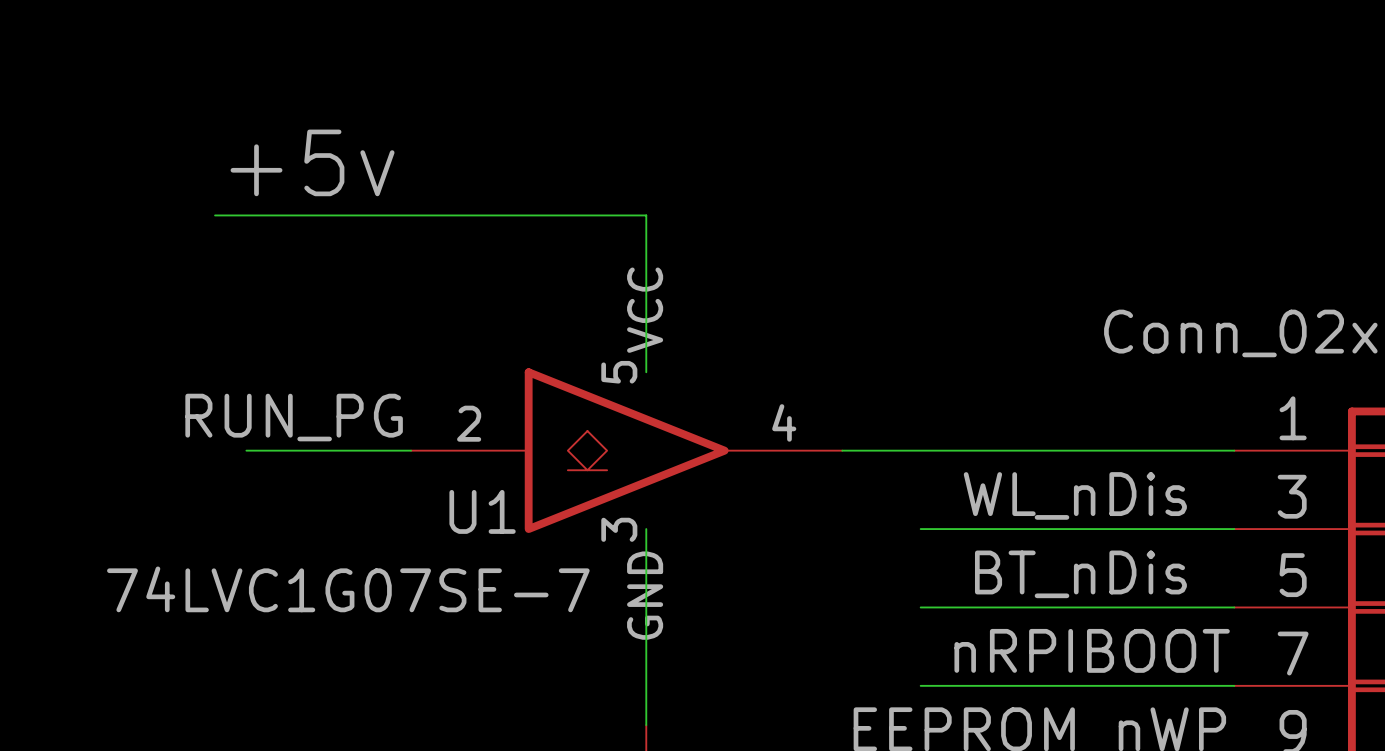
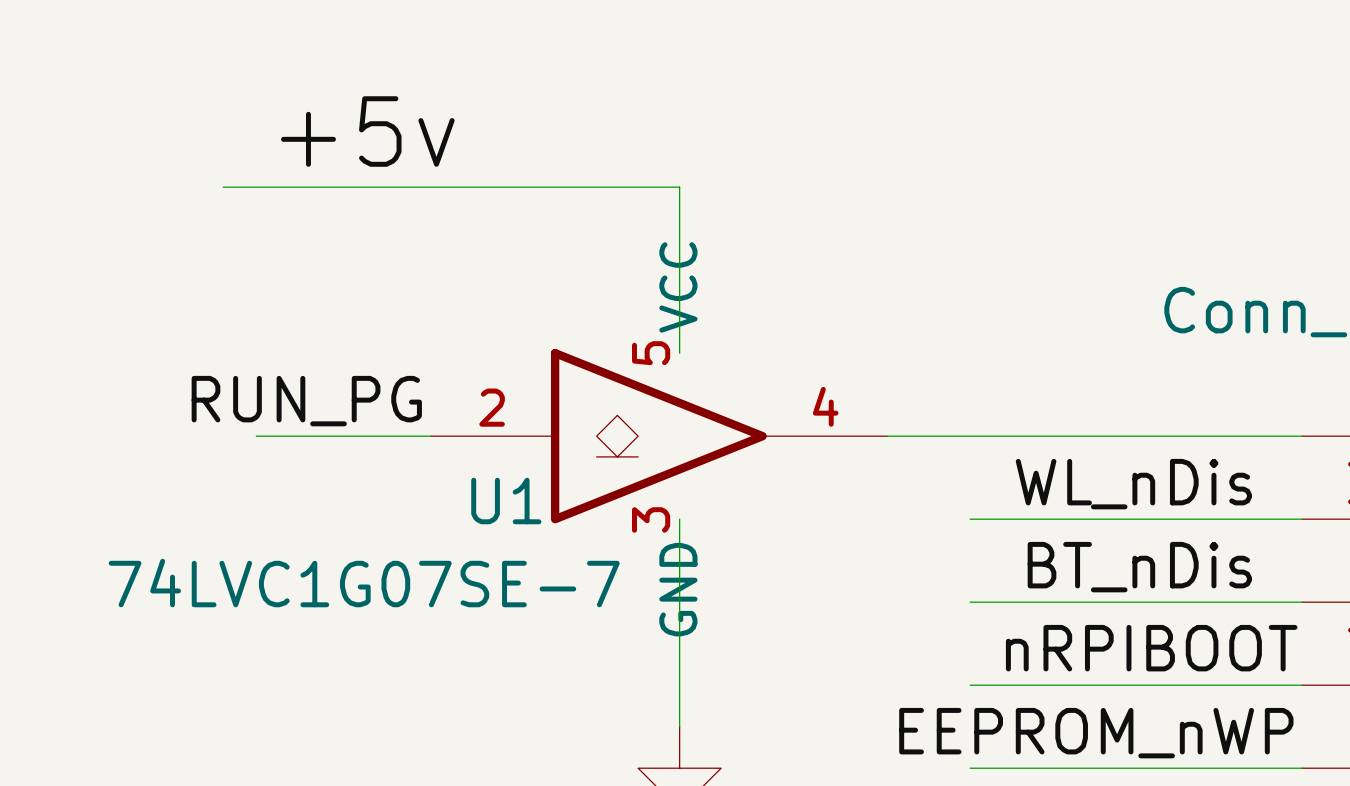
label position: +5v (312, 162) -> +5v (367, 131)

